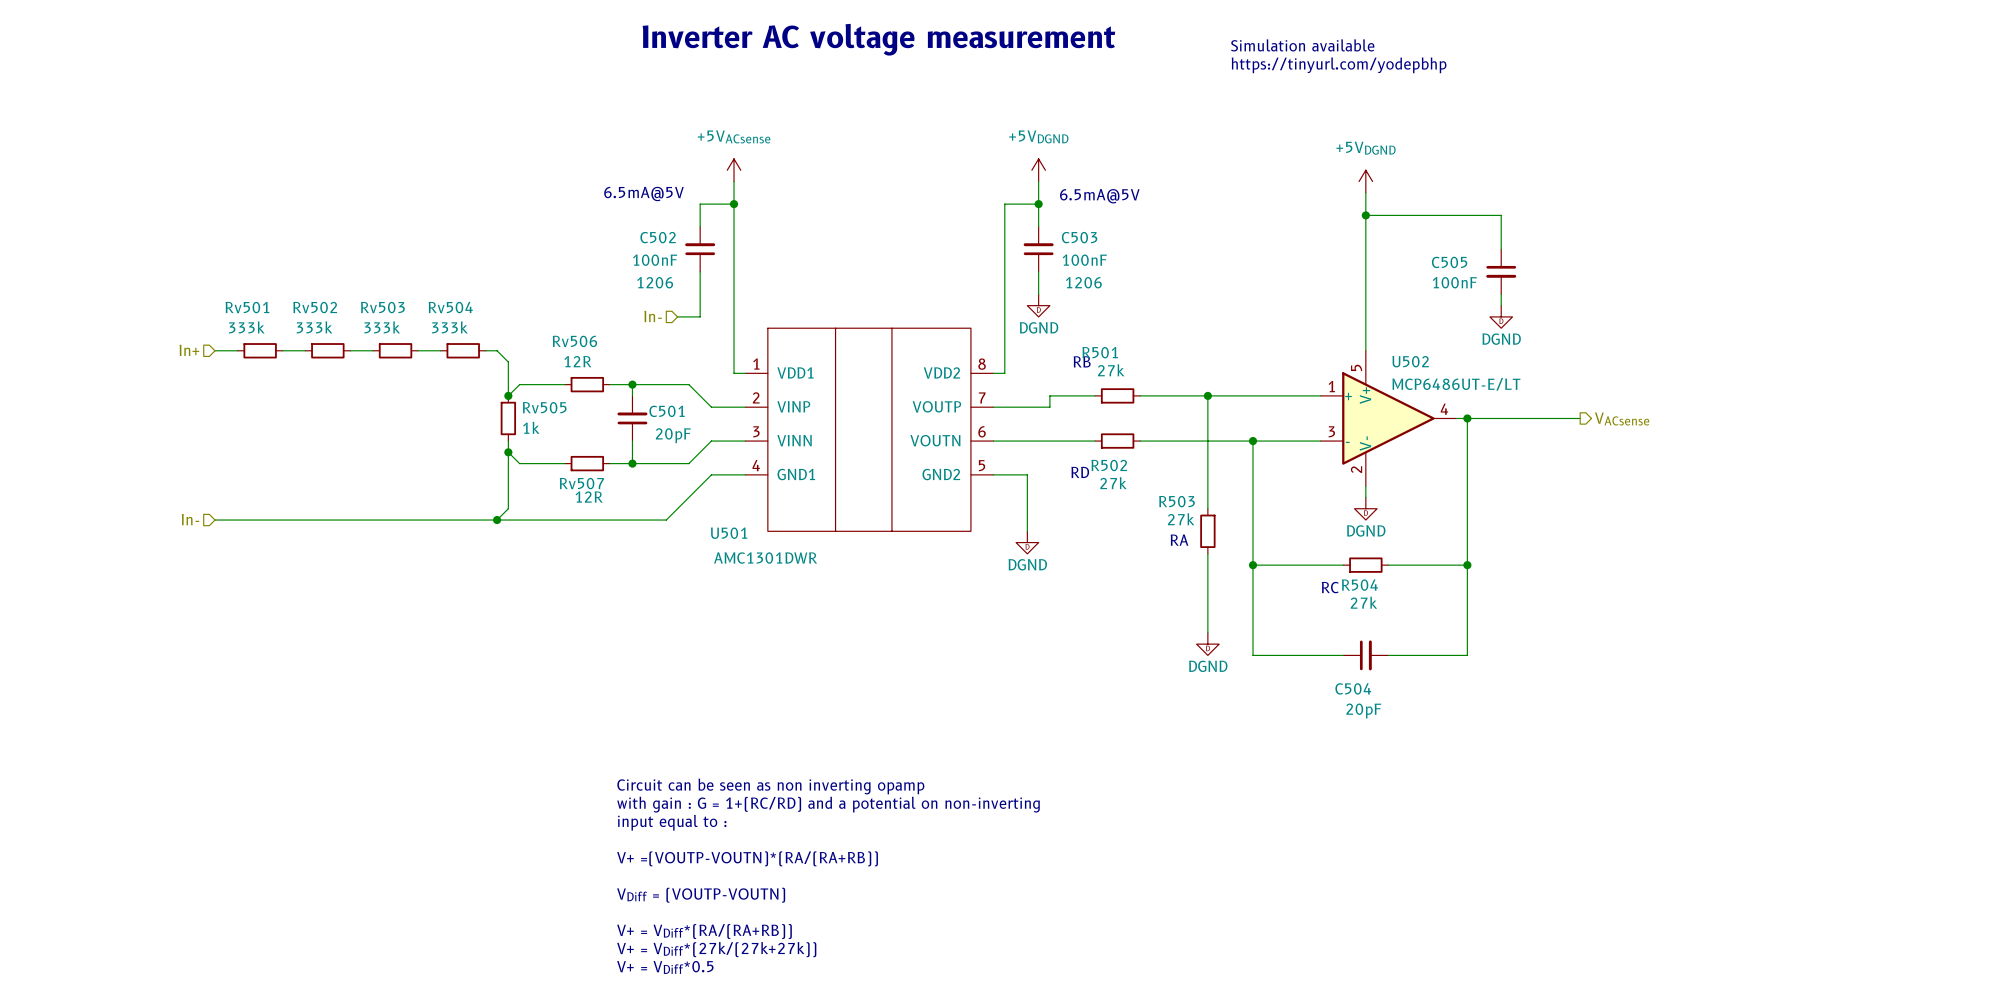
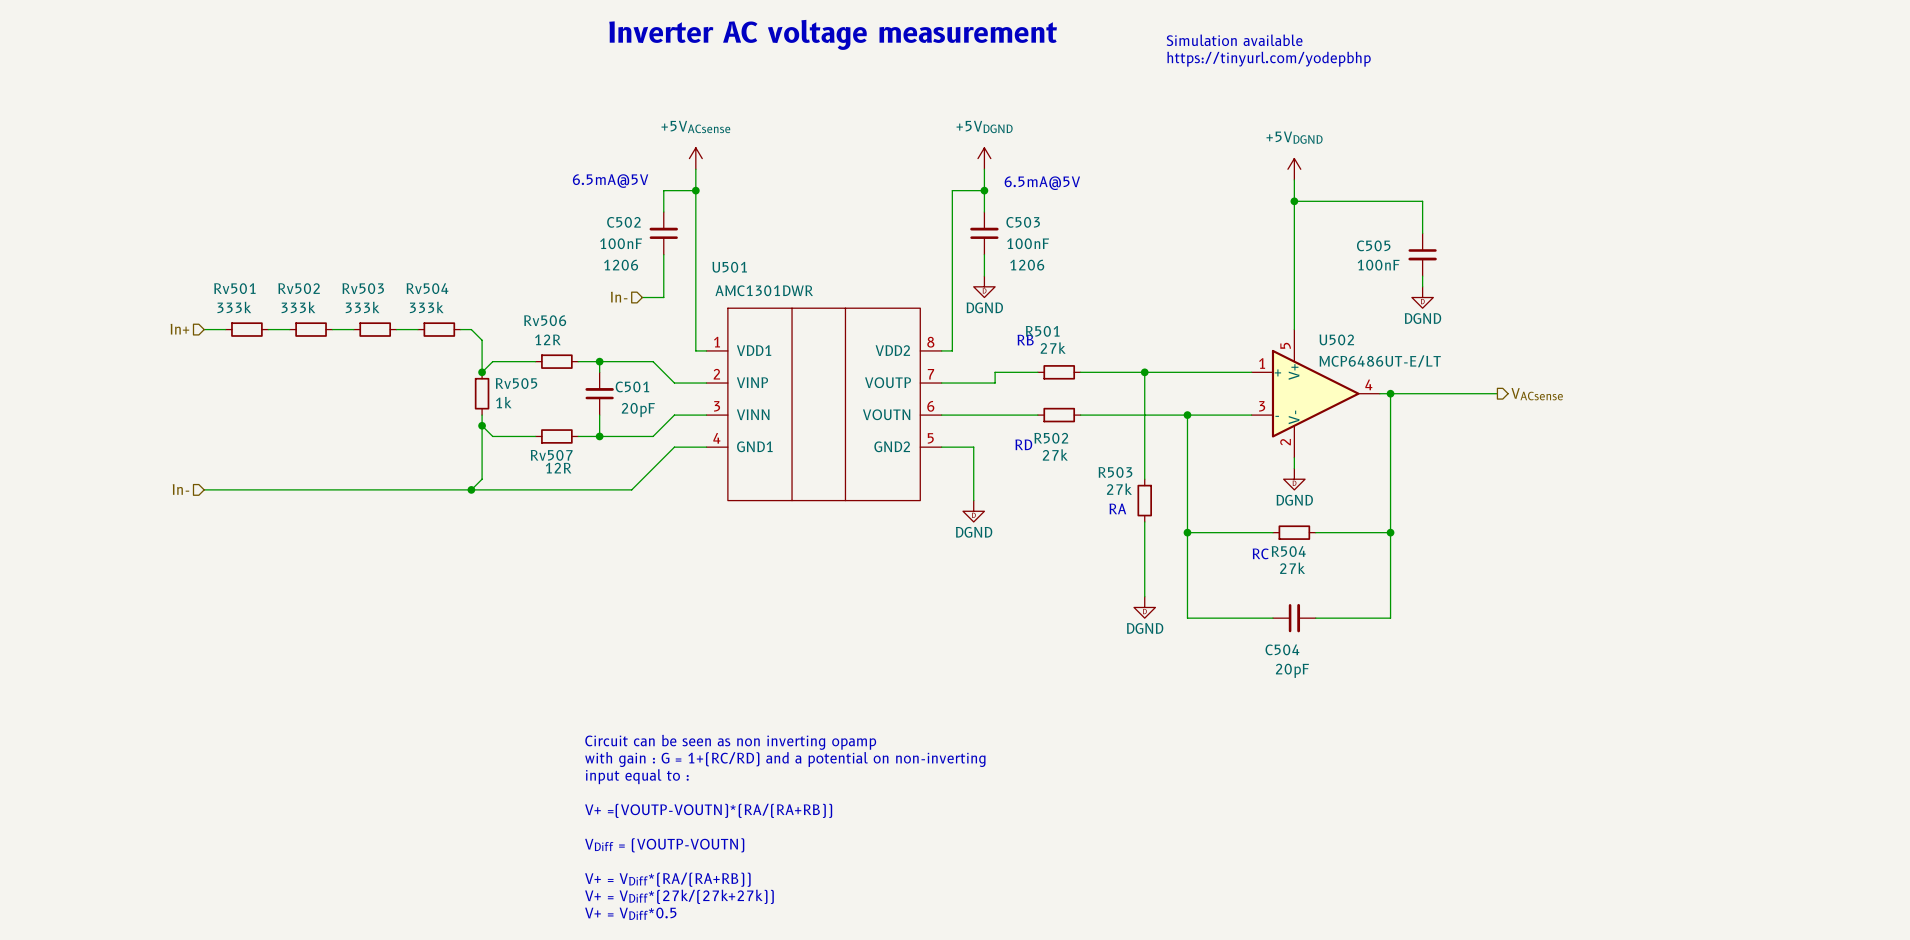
U501 name position: U501 (729, 533) -> U501 (729, 267)
U501 value position: AMC1301DWR (765, 558) -> AMC1301DWR (764, 290)

